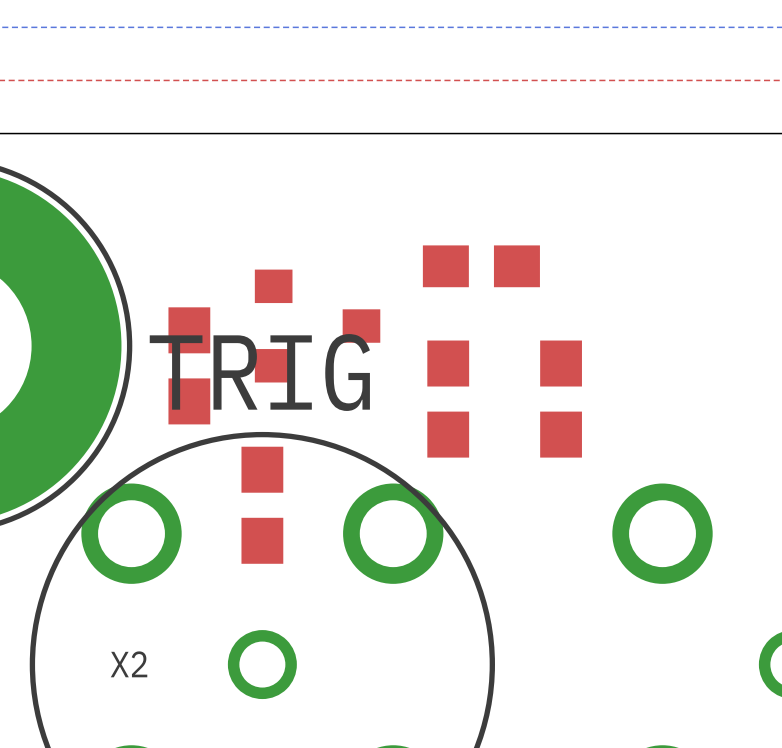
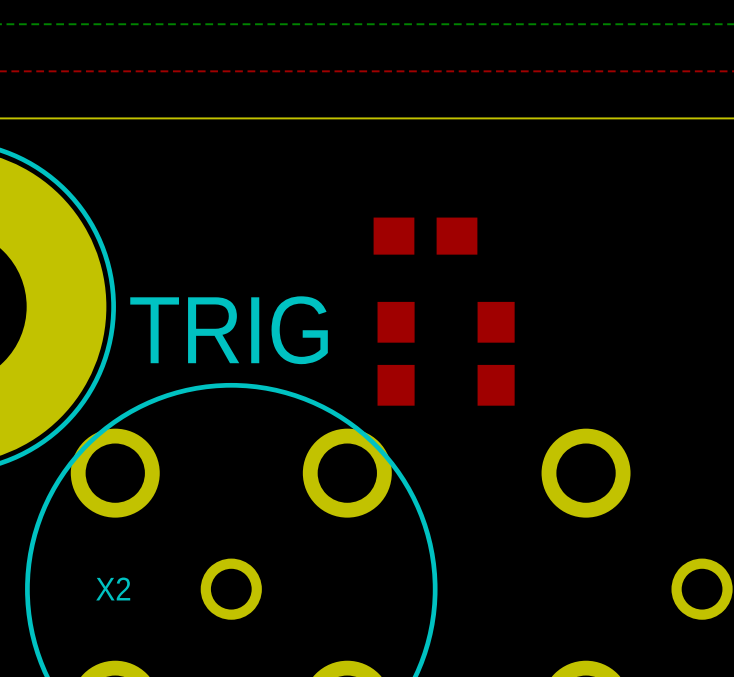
part: (317, 326) -> none
part: (189, 365) -> none
part: (262, 505) -> none

